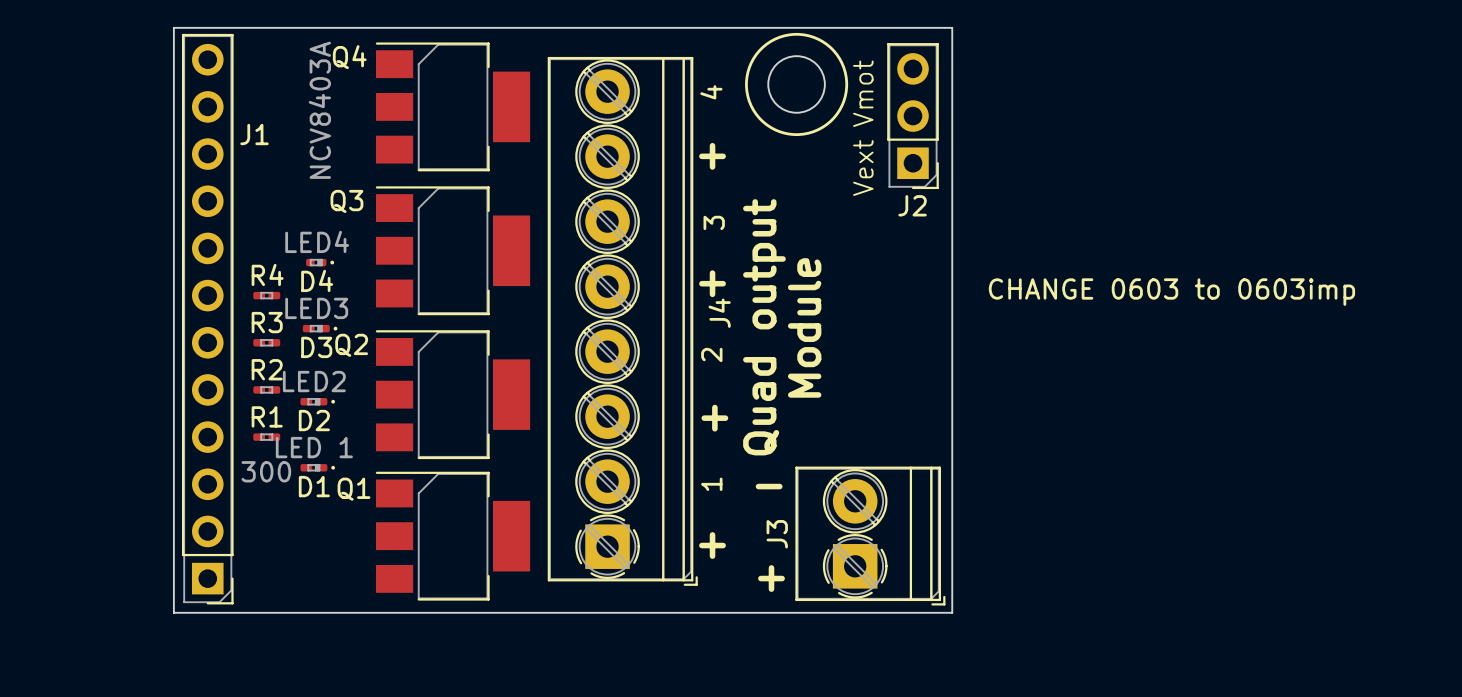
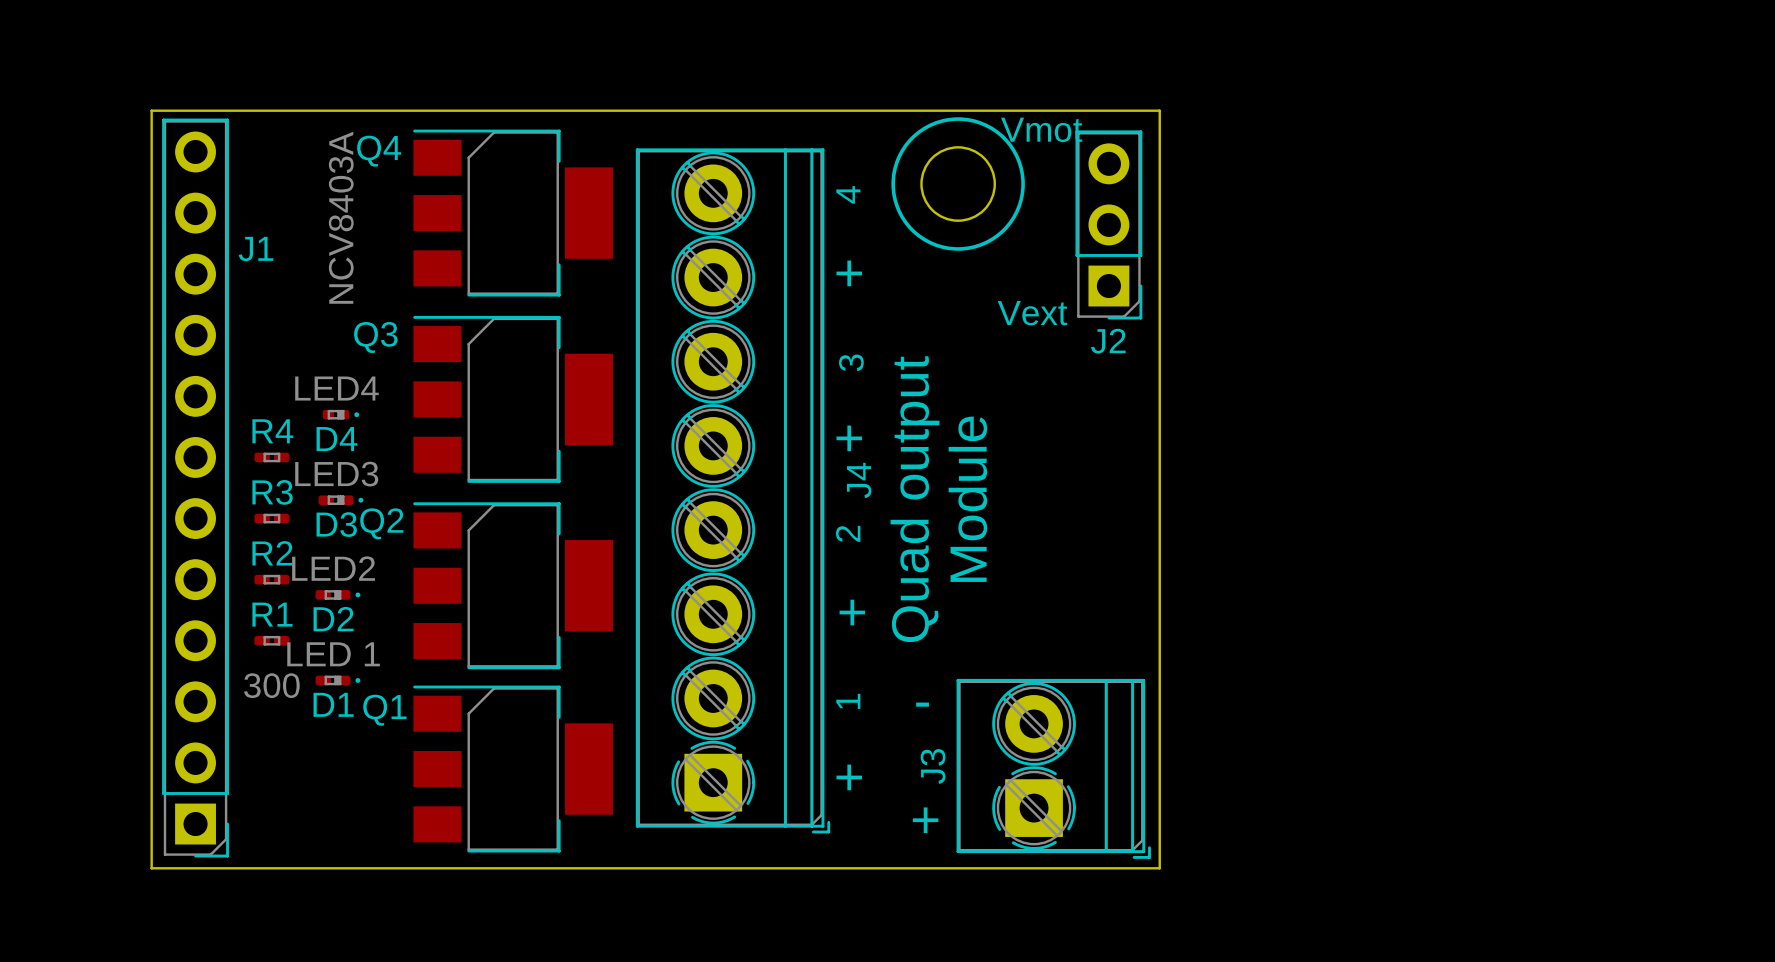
text rotation: 0° (863, 93) -> 90° clockwise (1041, 129)
text rotation: 0° (863, 168) -> 90° clockwise (1032, 313)
text: CHANGE 0603 to 0603imp (1171, 292) -> none

